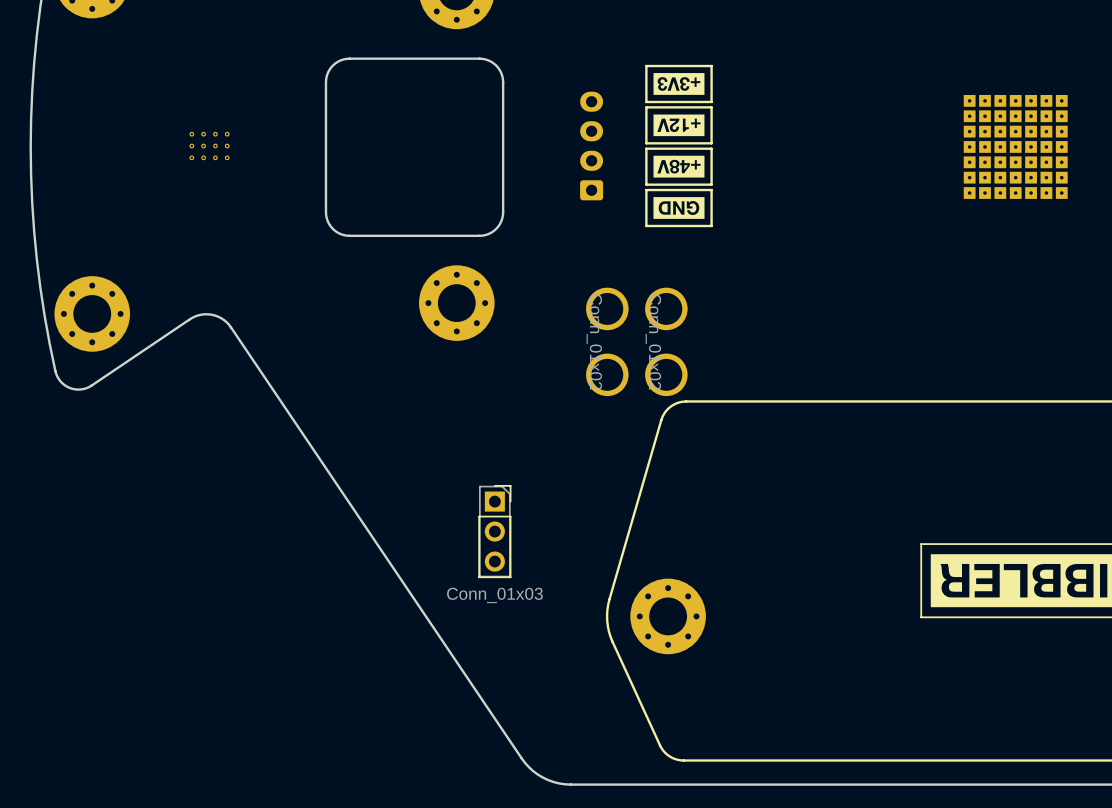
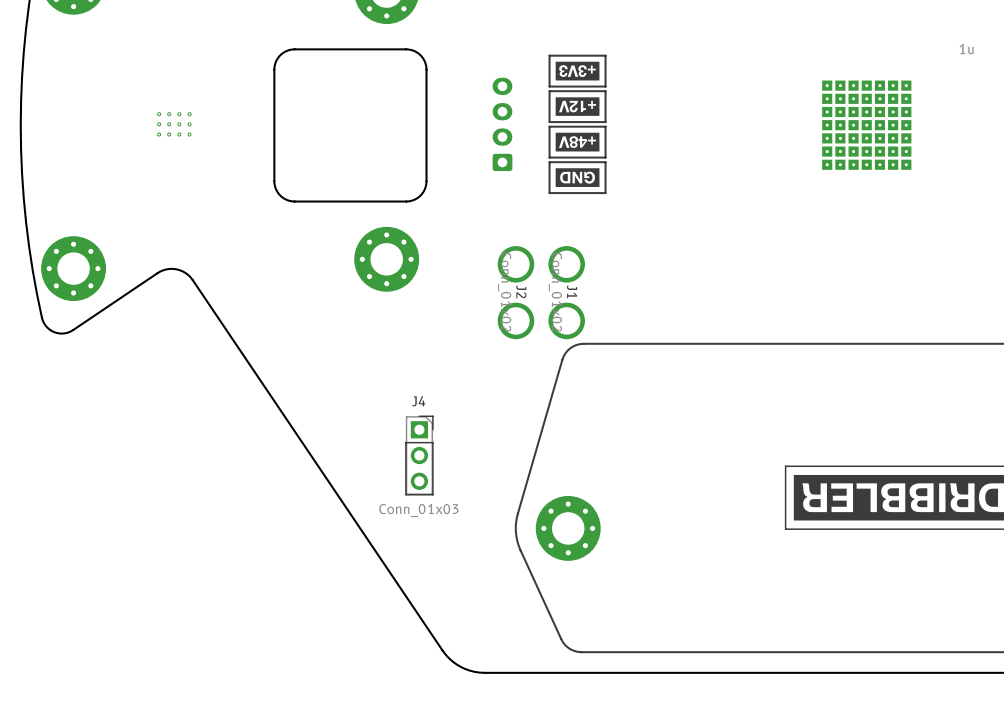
J2 name: none -> J2 (521, 291)
J1 name: none -> J1 (572, 291)
J4 name: none -> J4 (418, 401)

